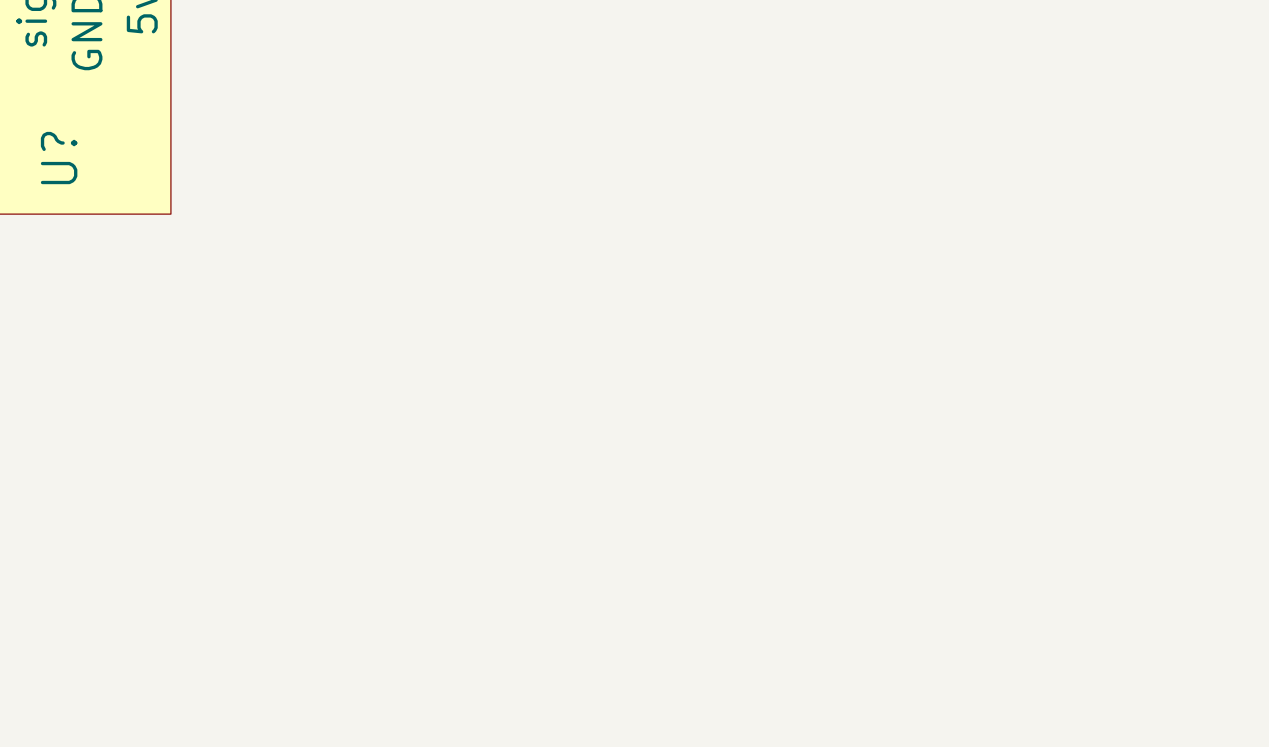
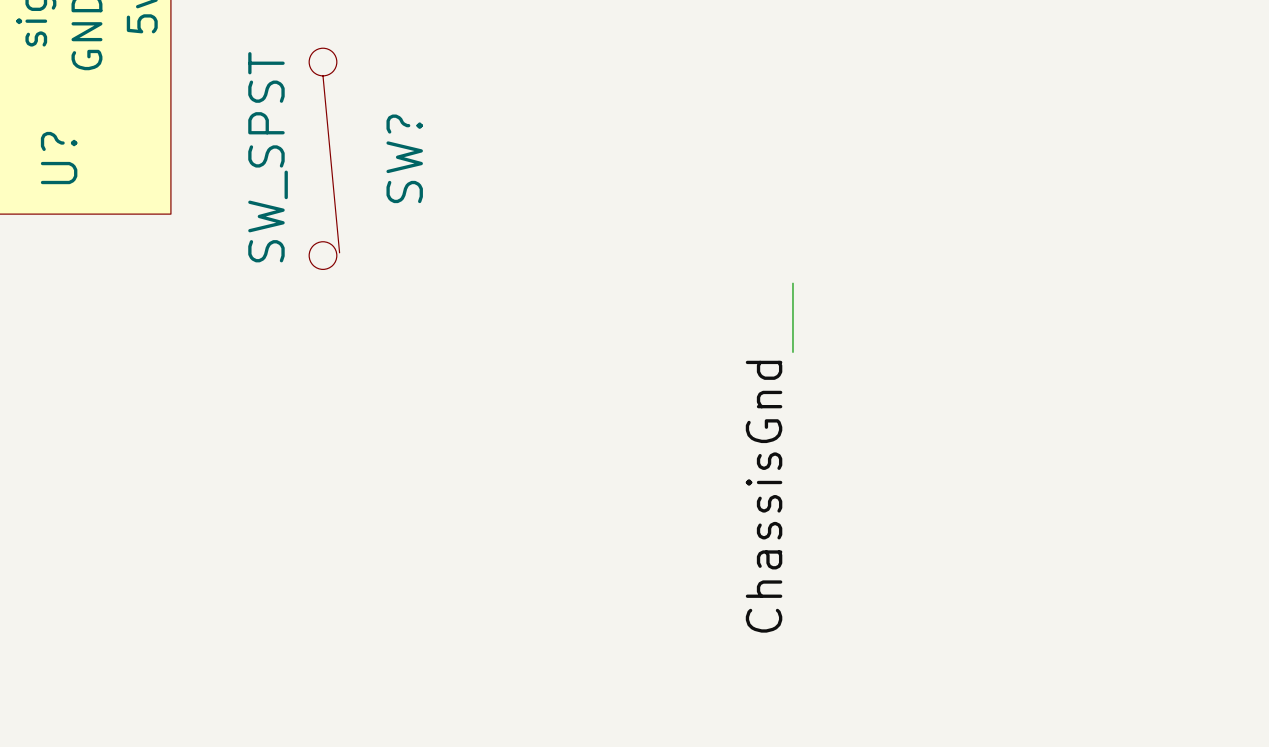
SW?: none -> SW_SPST (324, 158)
wire: none -> (792, 283) (792, 352)
label: none -> ChassisGnd (764, 496)

